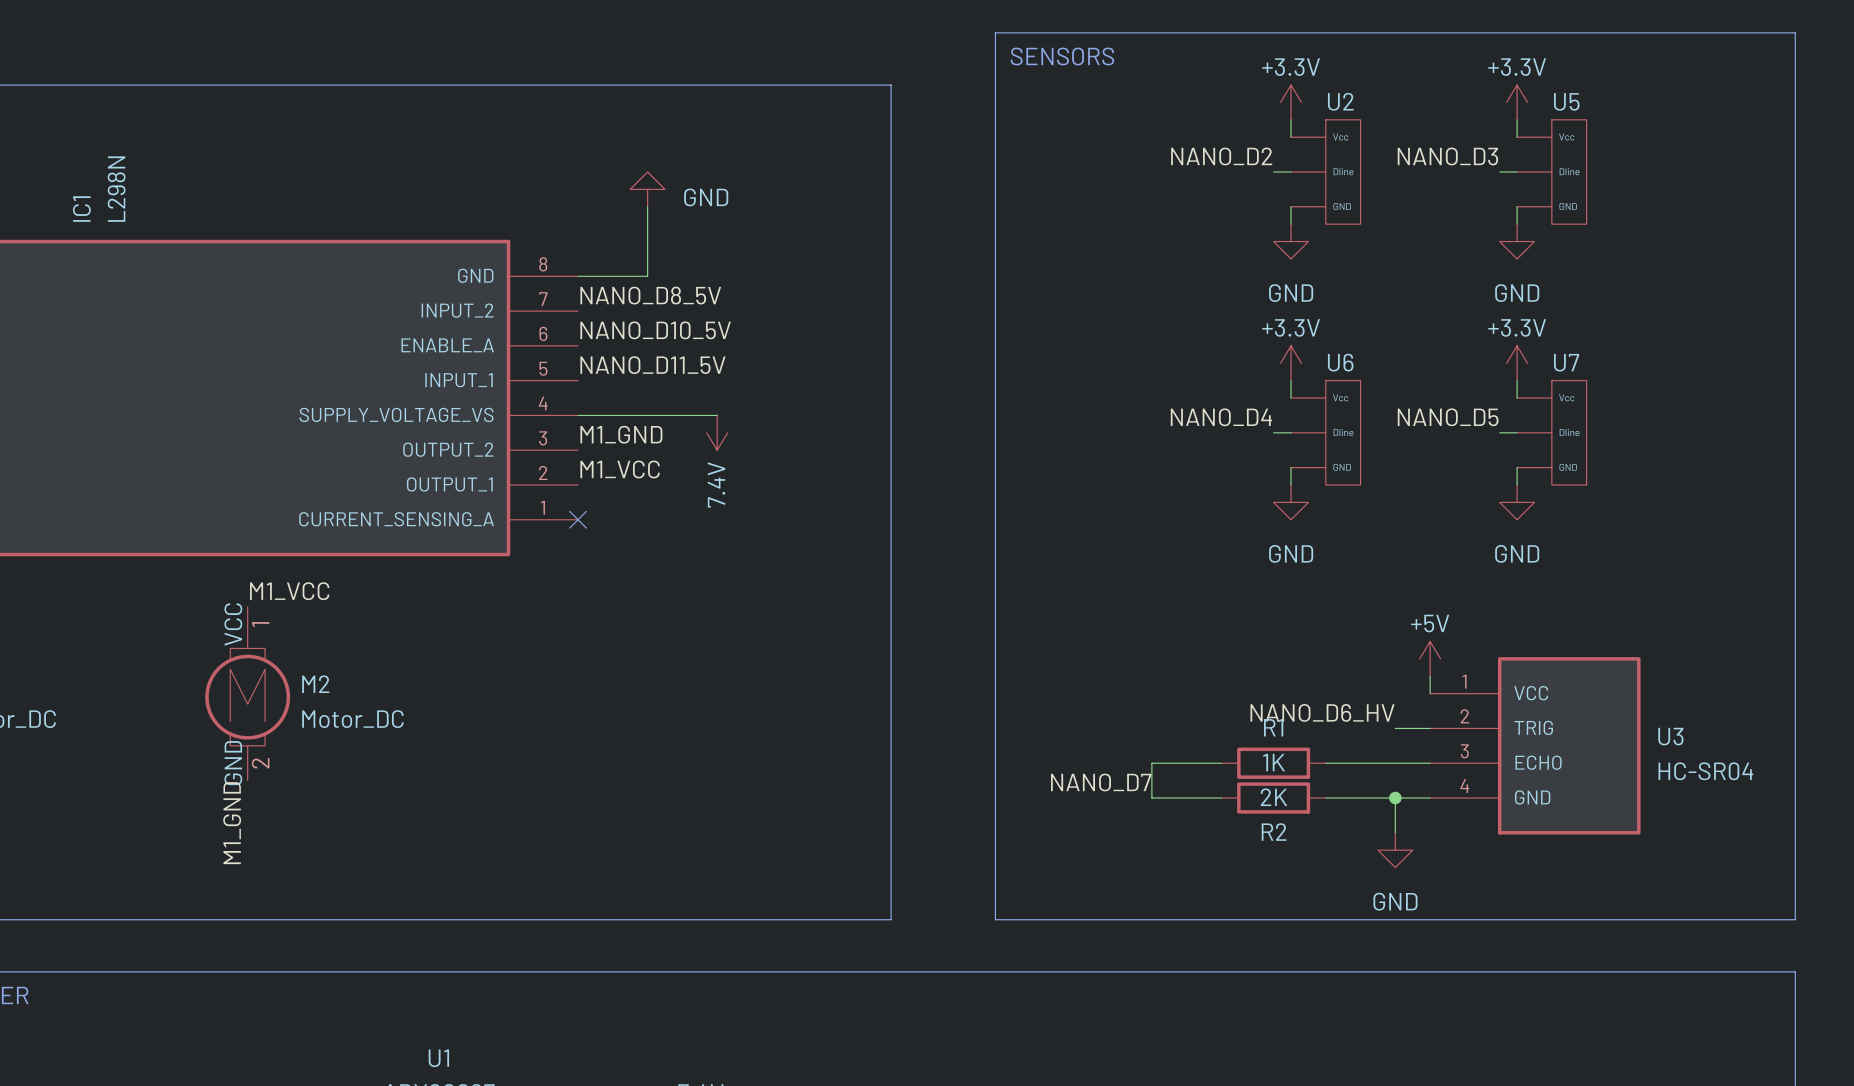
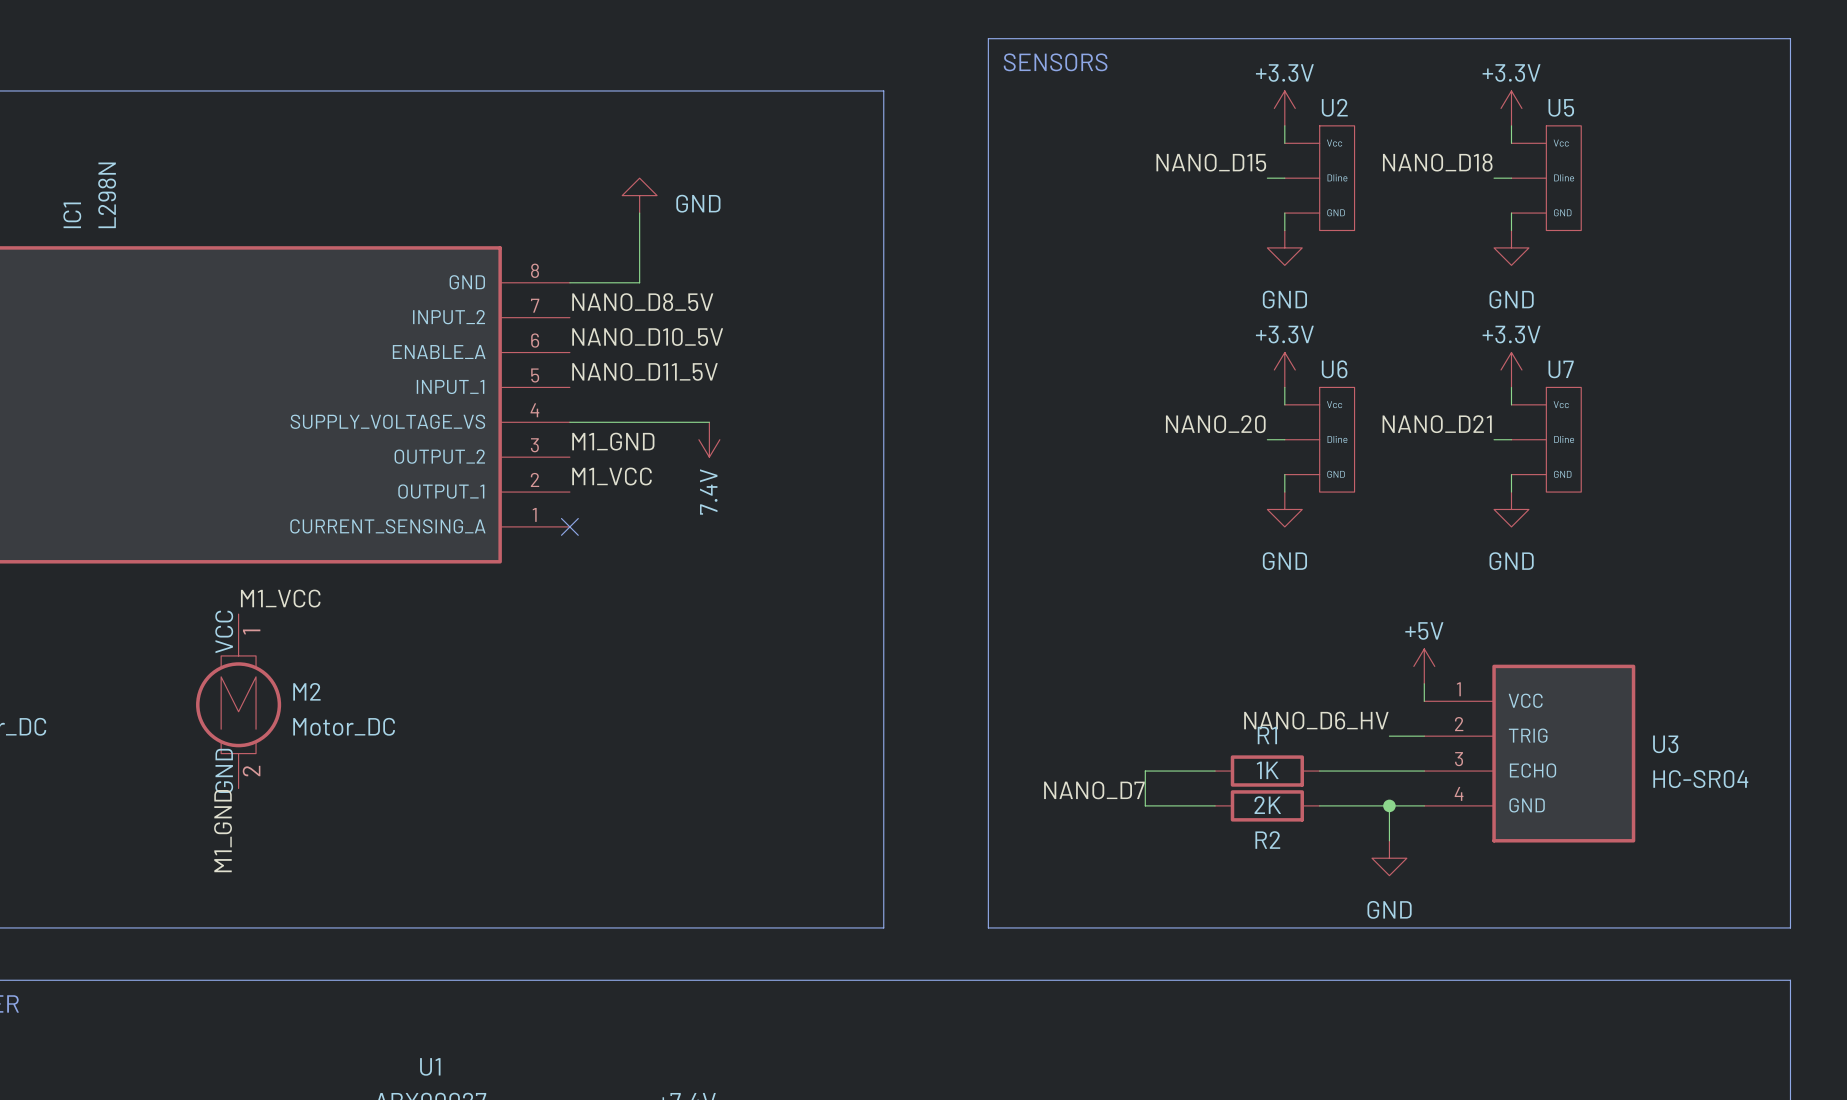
label: NANO_D2 (1221, 156) -> NANO_D15 (1211, 162)
label: NANO_D3 (1447, 156) -> NANO_D18 (1437, 162)
label: NANO_D4 (1221, 417) -> NANO_20 (1215, 424)
label: NANO_D5 (1448, 417) -> NANO_D21 (1437, 424)

